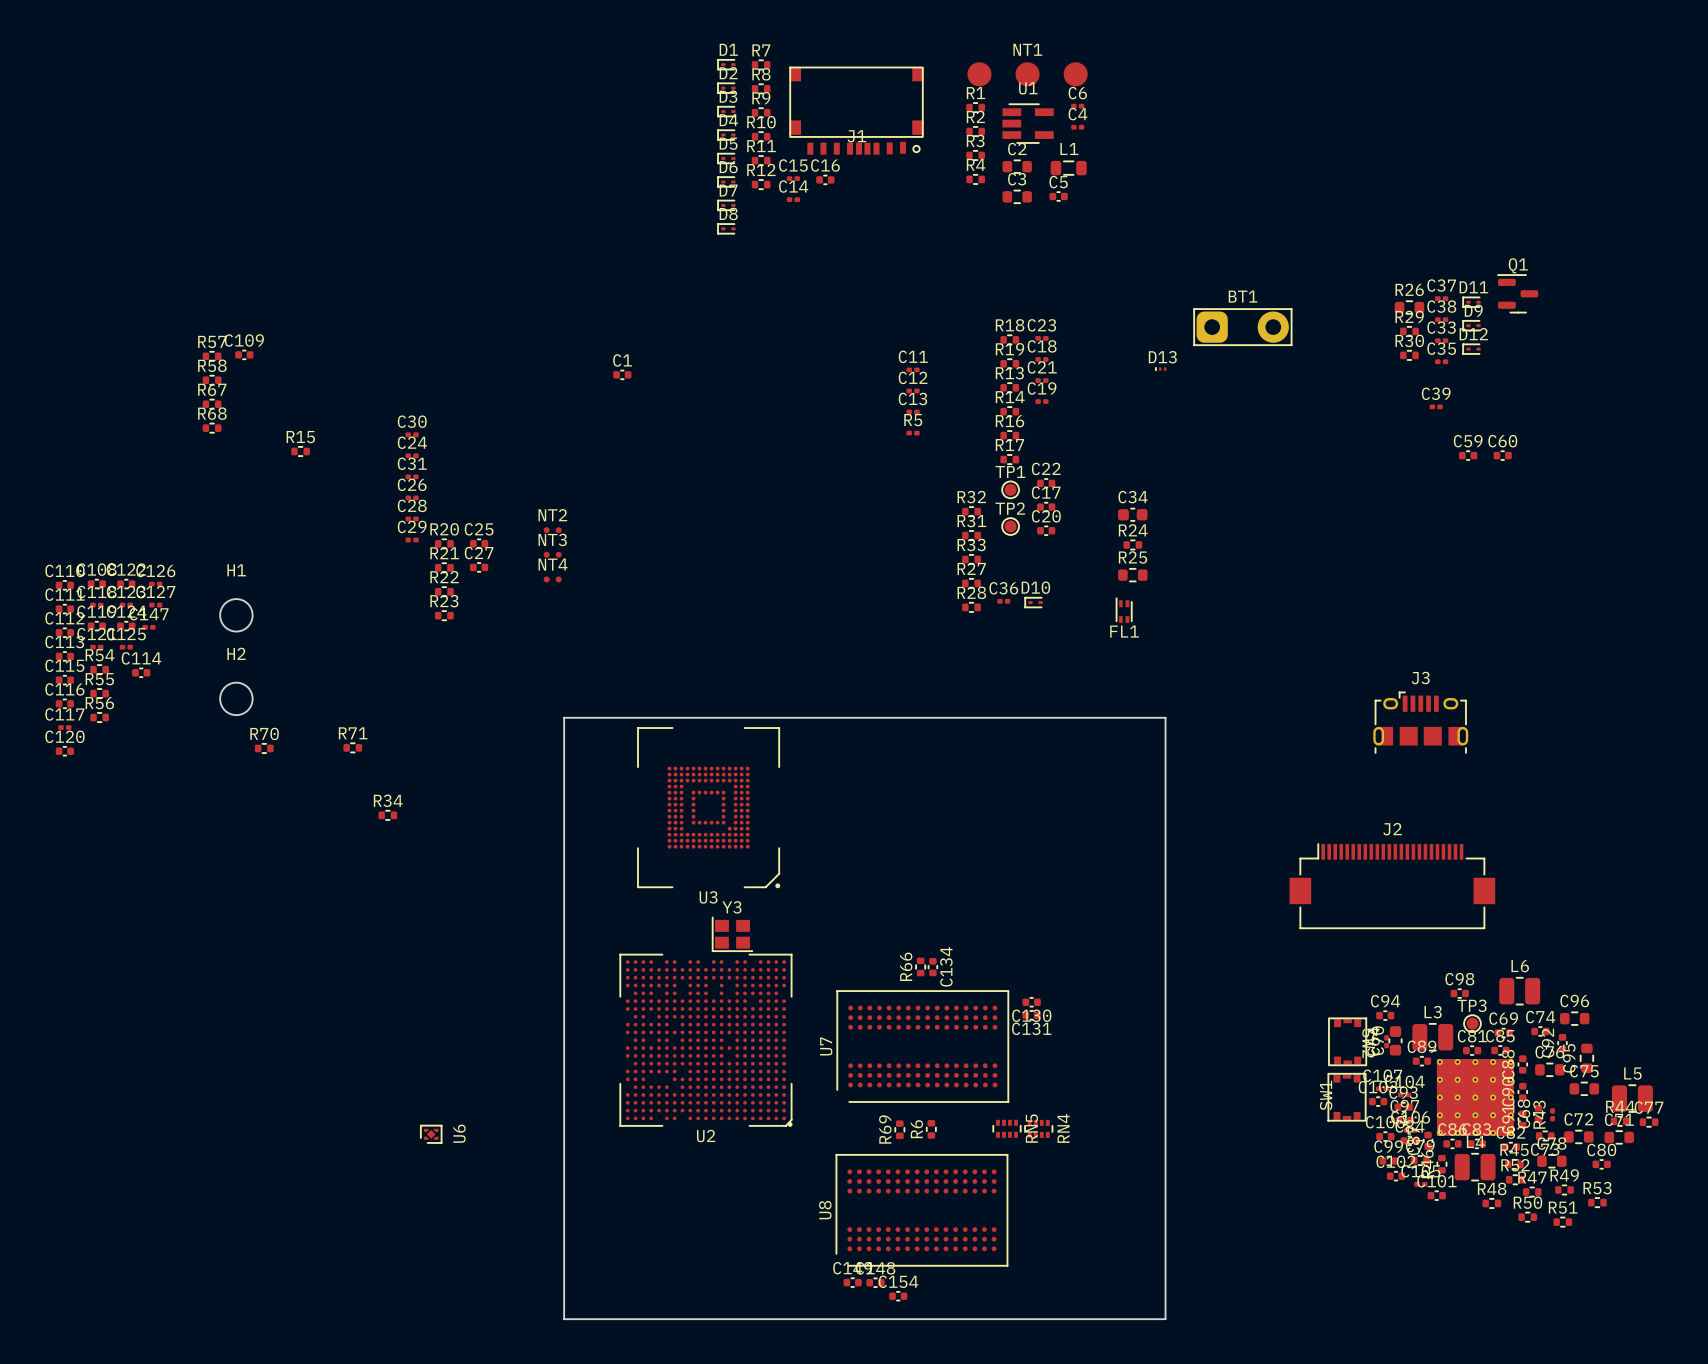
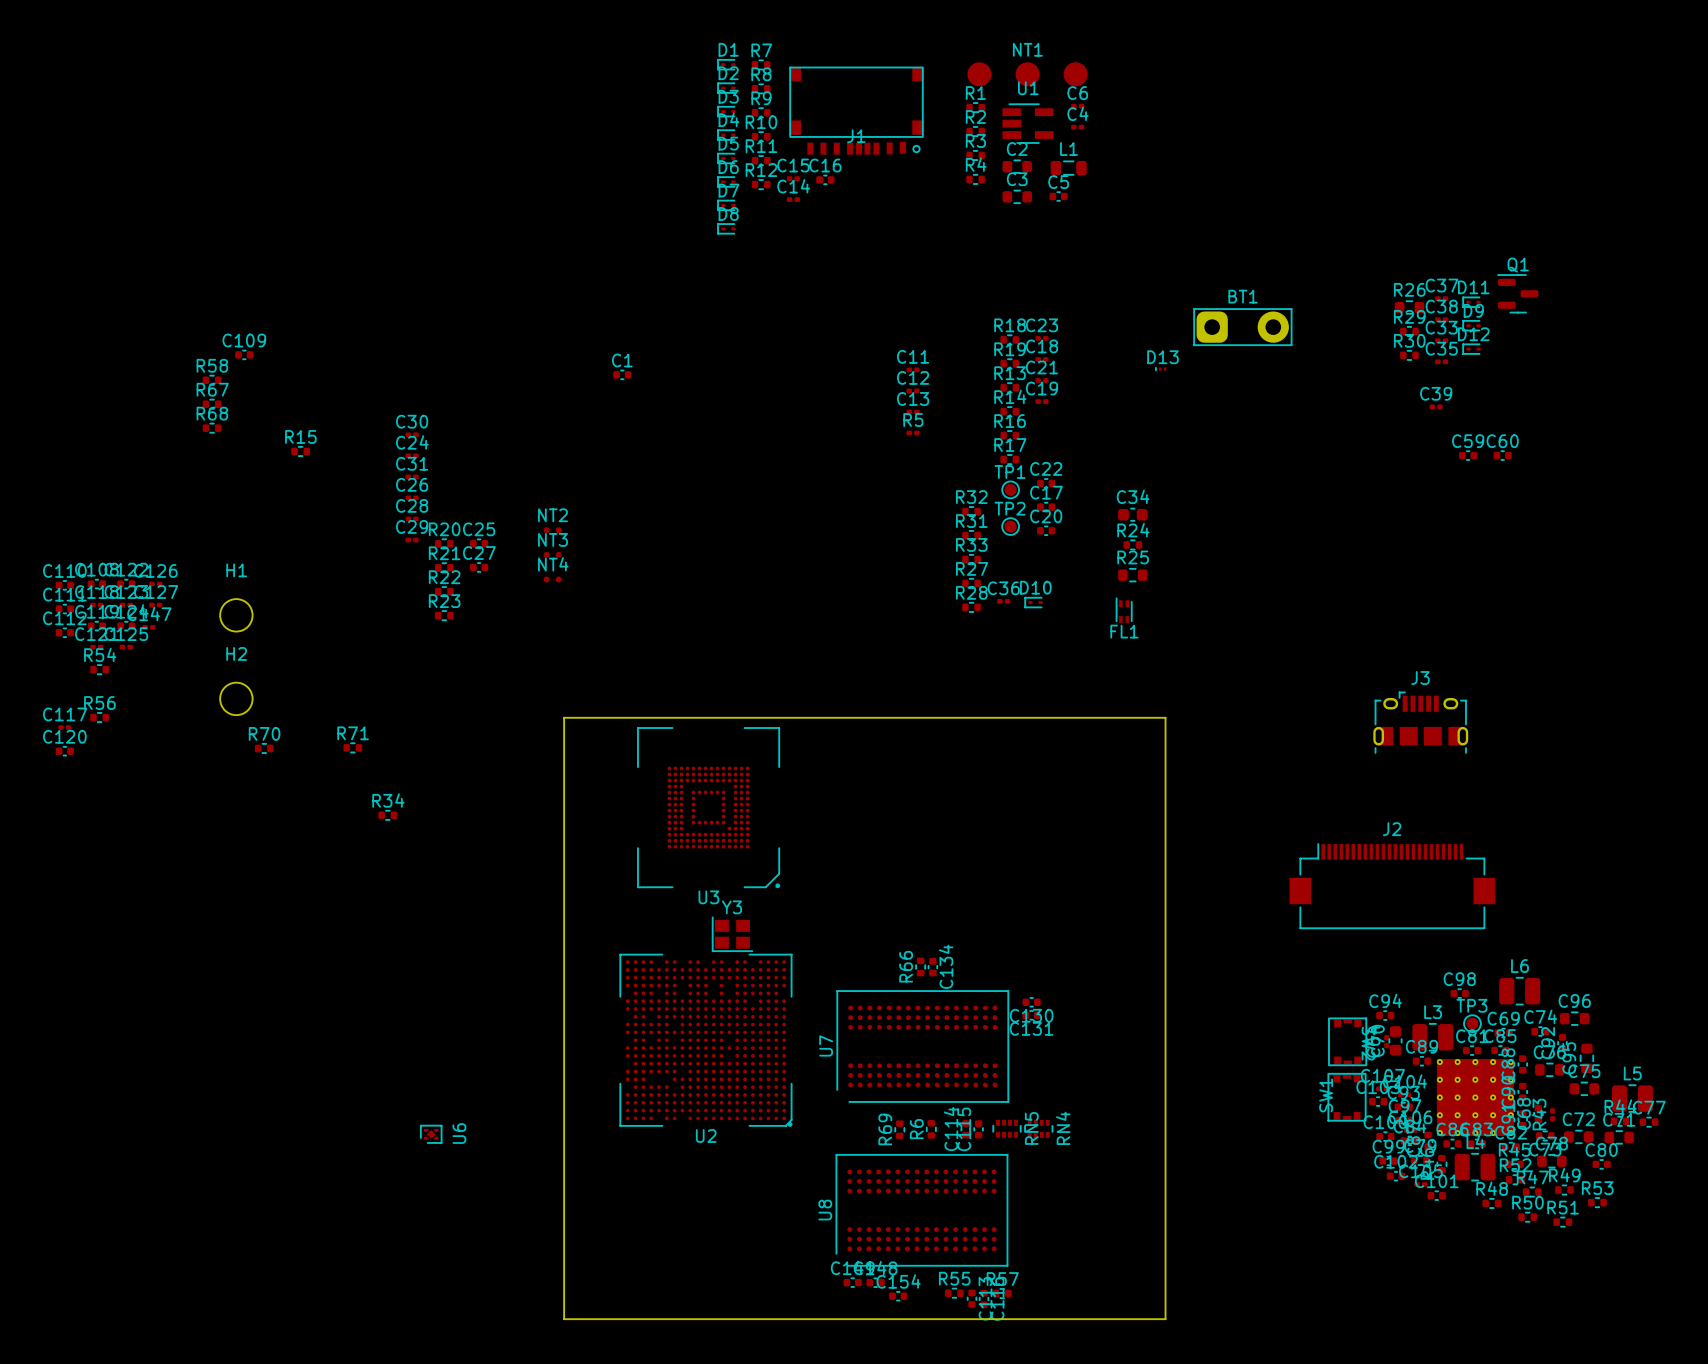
R57 position: (212, 356) -> (1002, 1293)
C113 rotation: 0° (64, 656) -> 90° clockwise (971, 1298)
C113 position: (64, 656) -> (971, 1298)
C114 rotation: 0° (141, 672) -> 90° clockwise (965, 1129)
C114 position: (141, 672) -> (965, 1129)
C115 rotation: 0° (64, 680) -> 90° clockwise (978, 1129)
C115 position: (64, 680) -> (978, 1129)
R55 position: (99, 693) -> (954, 1293)
C116 rotation: 0° (64, 703) -> 90° clockwise (984, 1298)
C116 position: (64, 703) -> (984, 1298)

